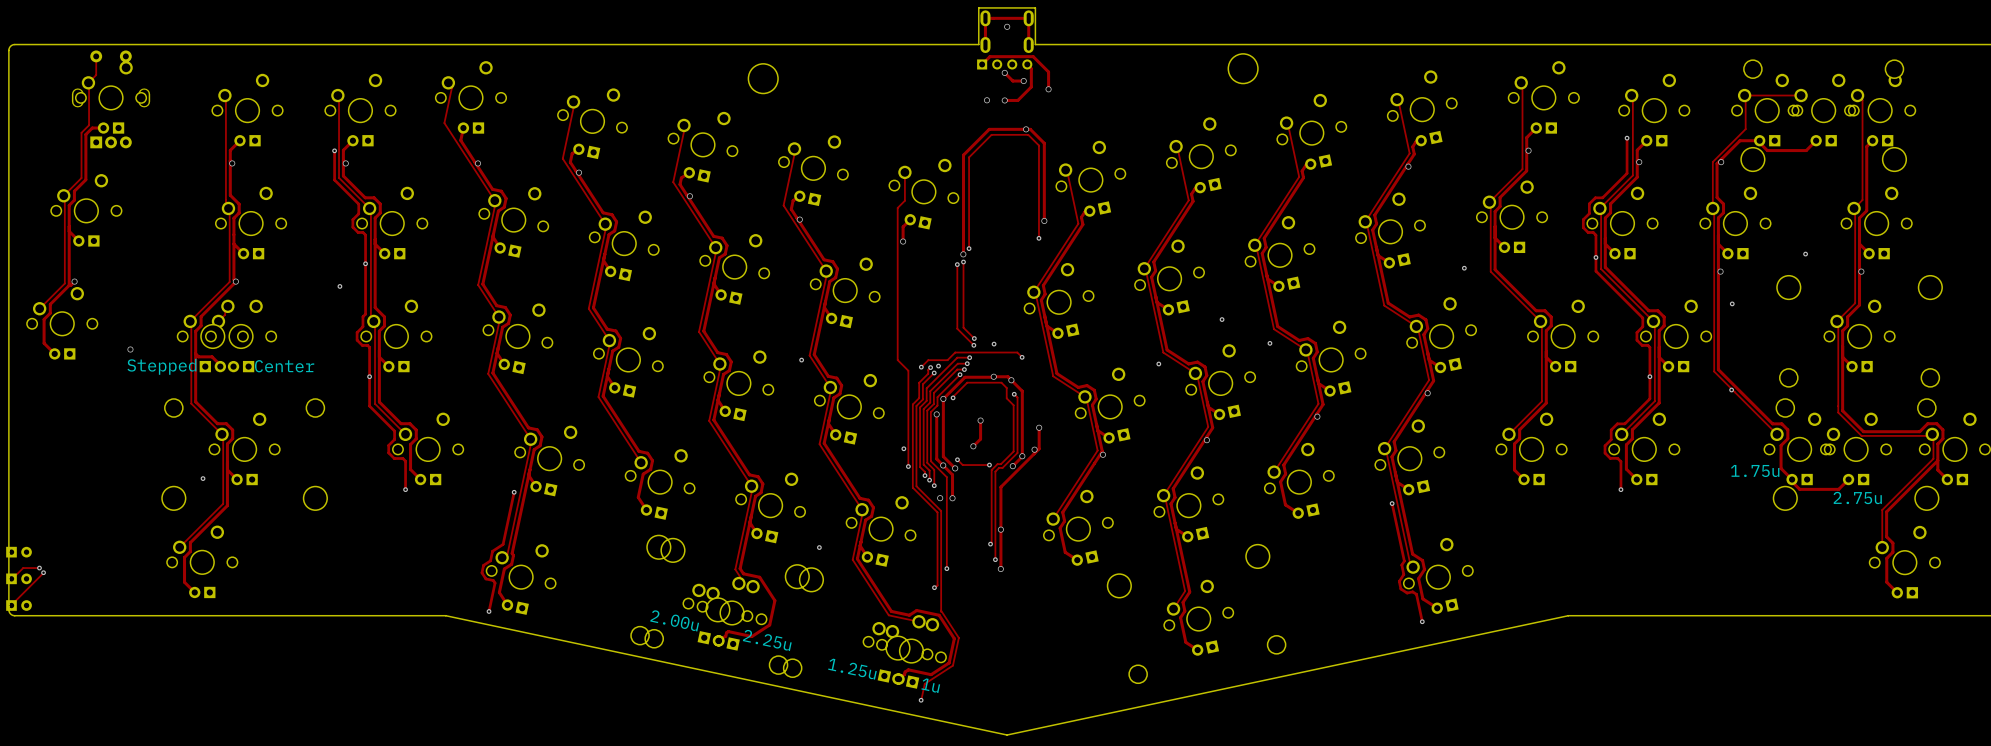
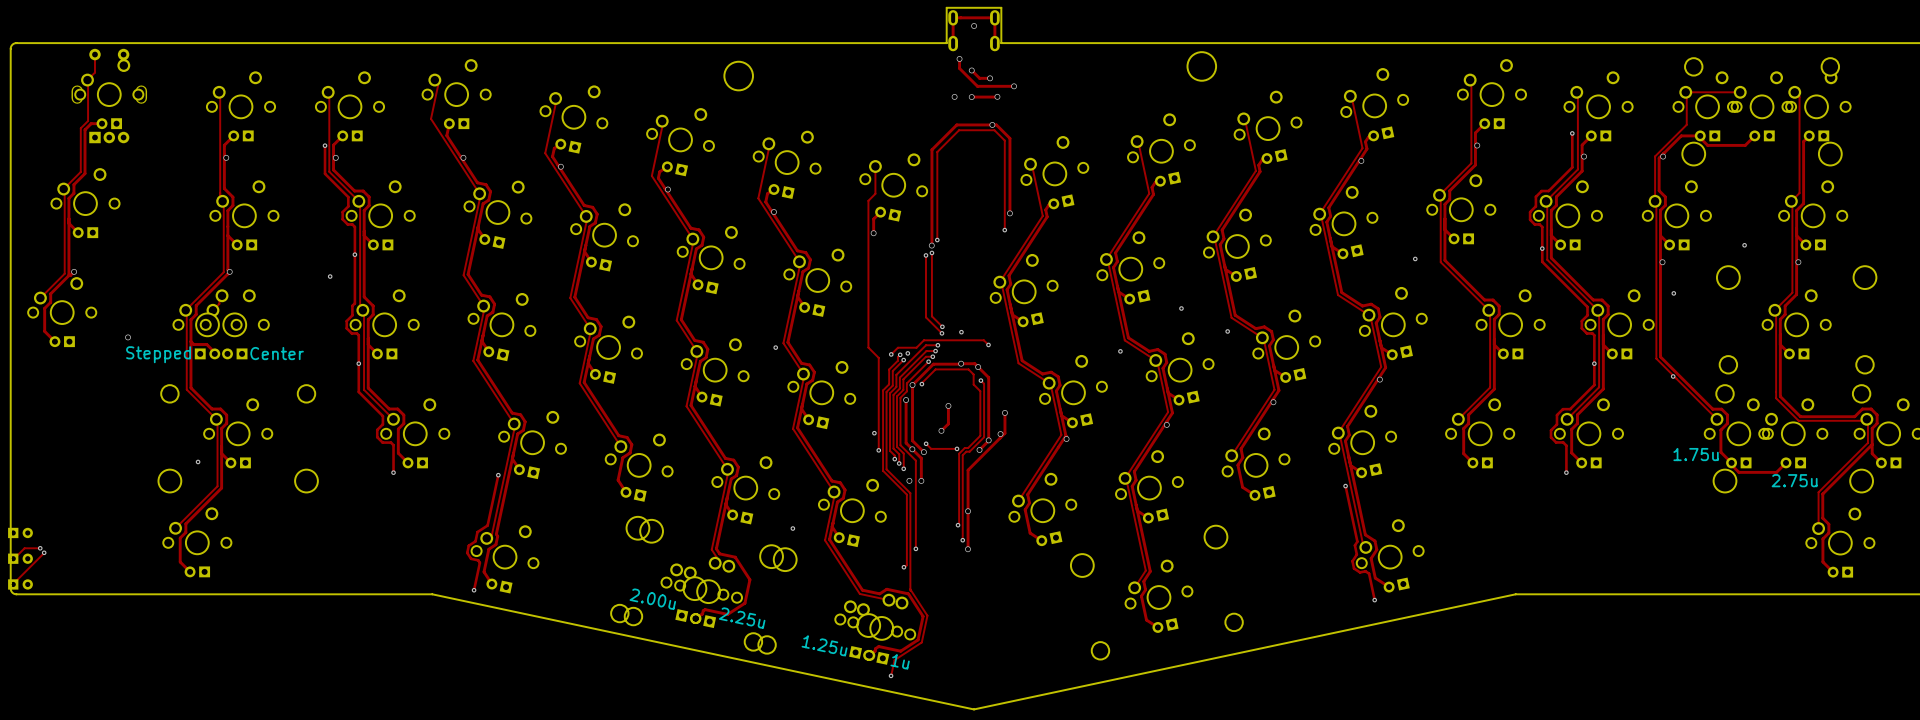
via: none -> (959, 58)
track: (982, 64) (989, 56) (1033, 56) (1048, 72) (1048, 89) -> (959, 58) (959, 68) (977, 86) (1014, 86)
part: (1004, 64) -> none
track: (1027, 64) (1031, 68) (1031, 86) (1017, 100) -> (997, 96) (984, 97)
via: none -> (997, 96)

